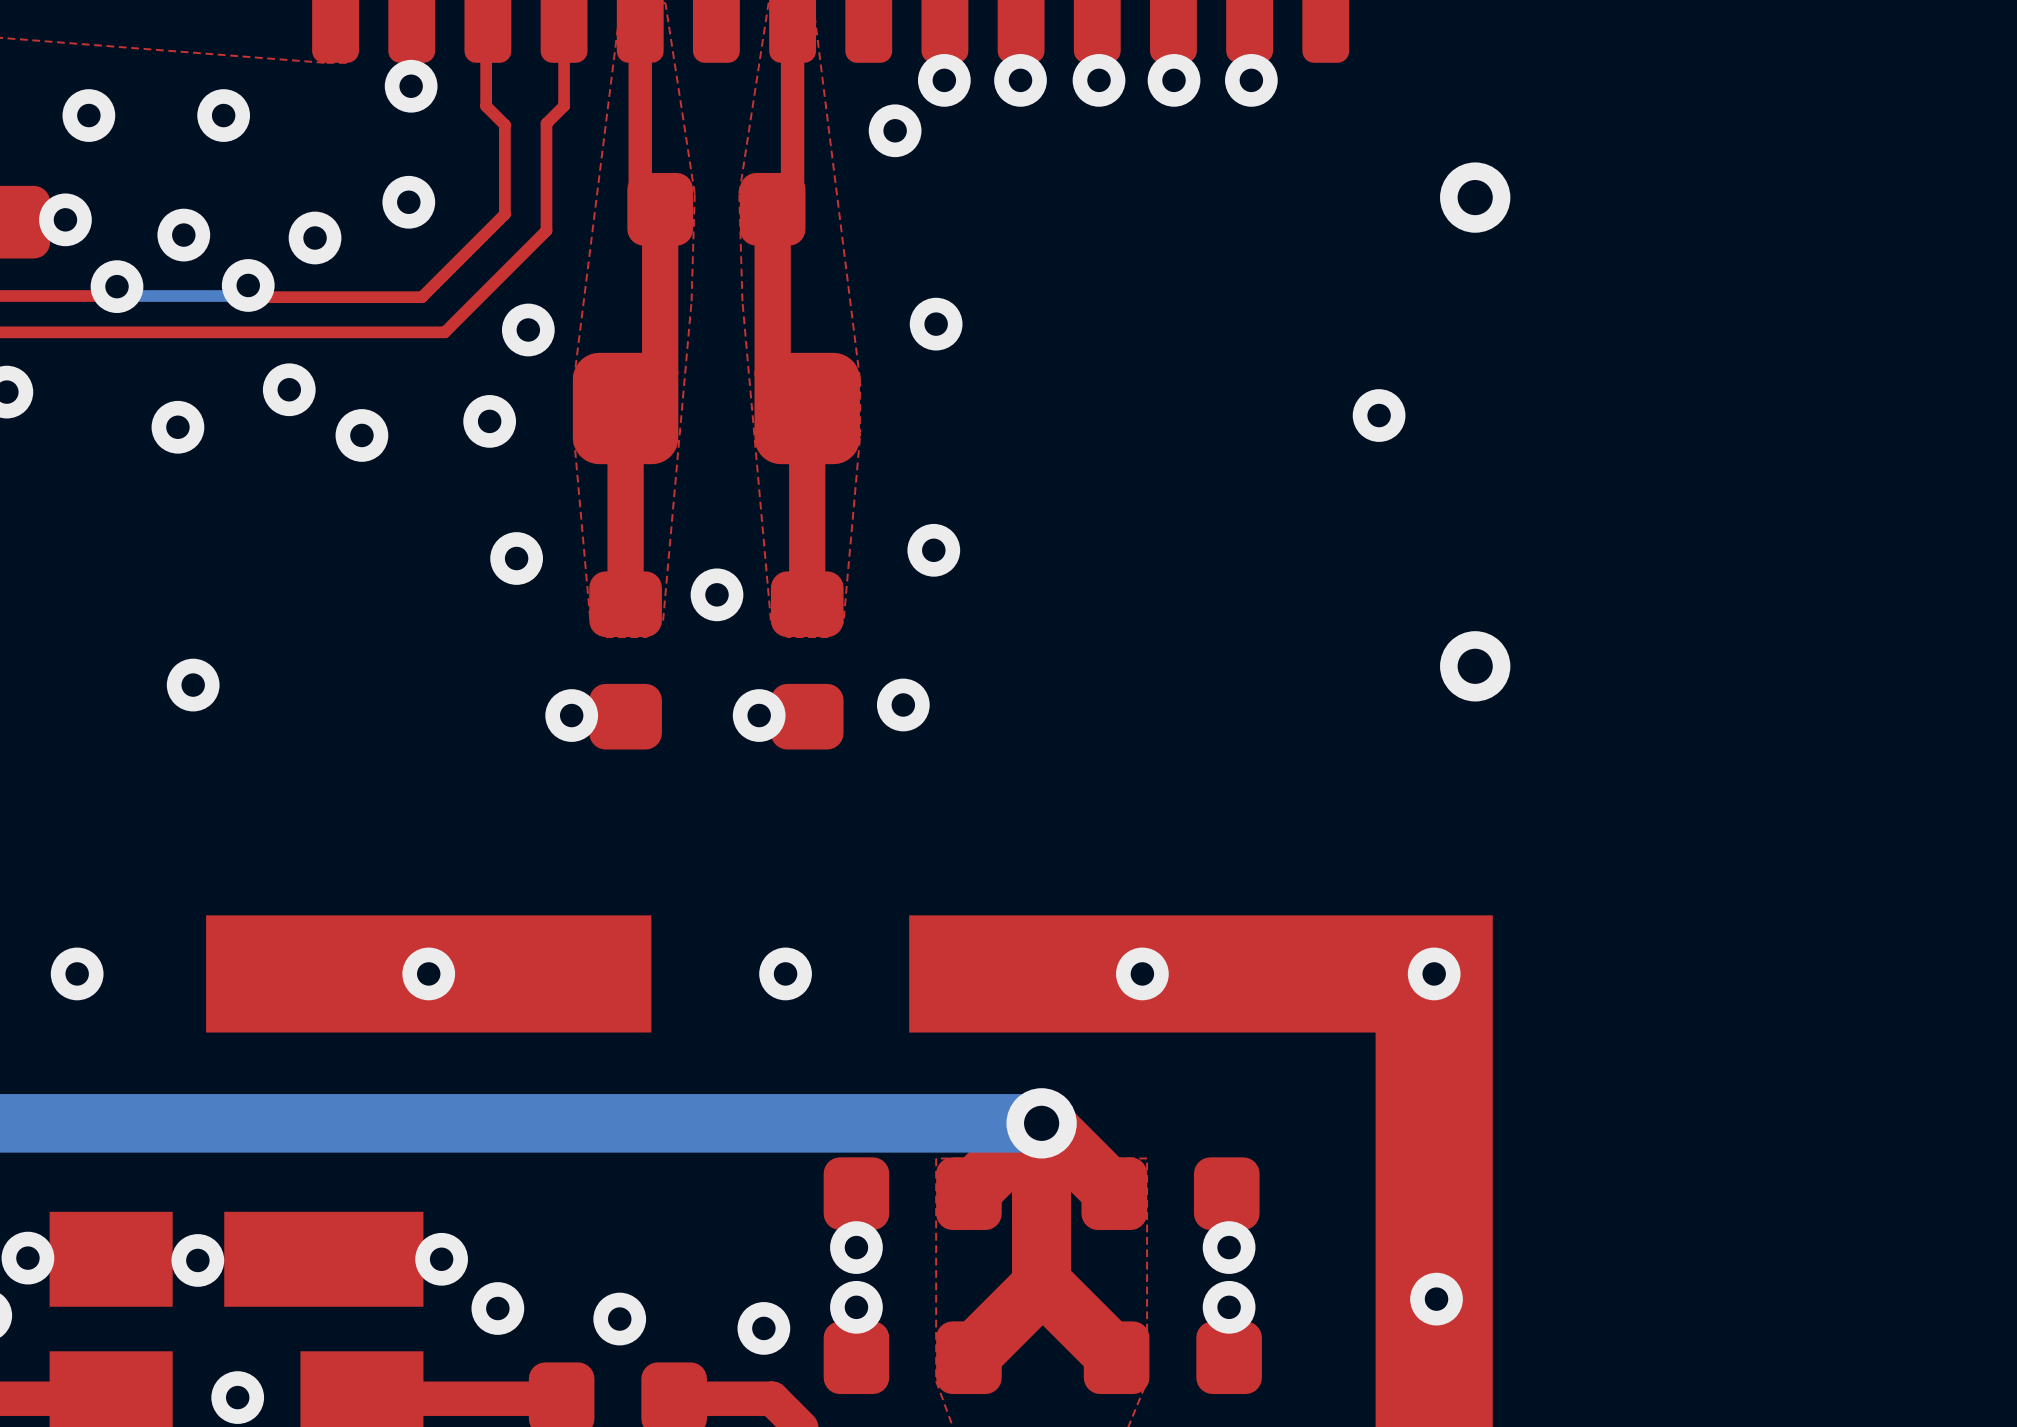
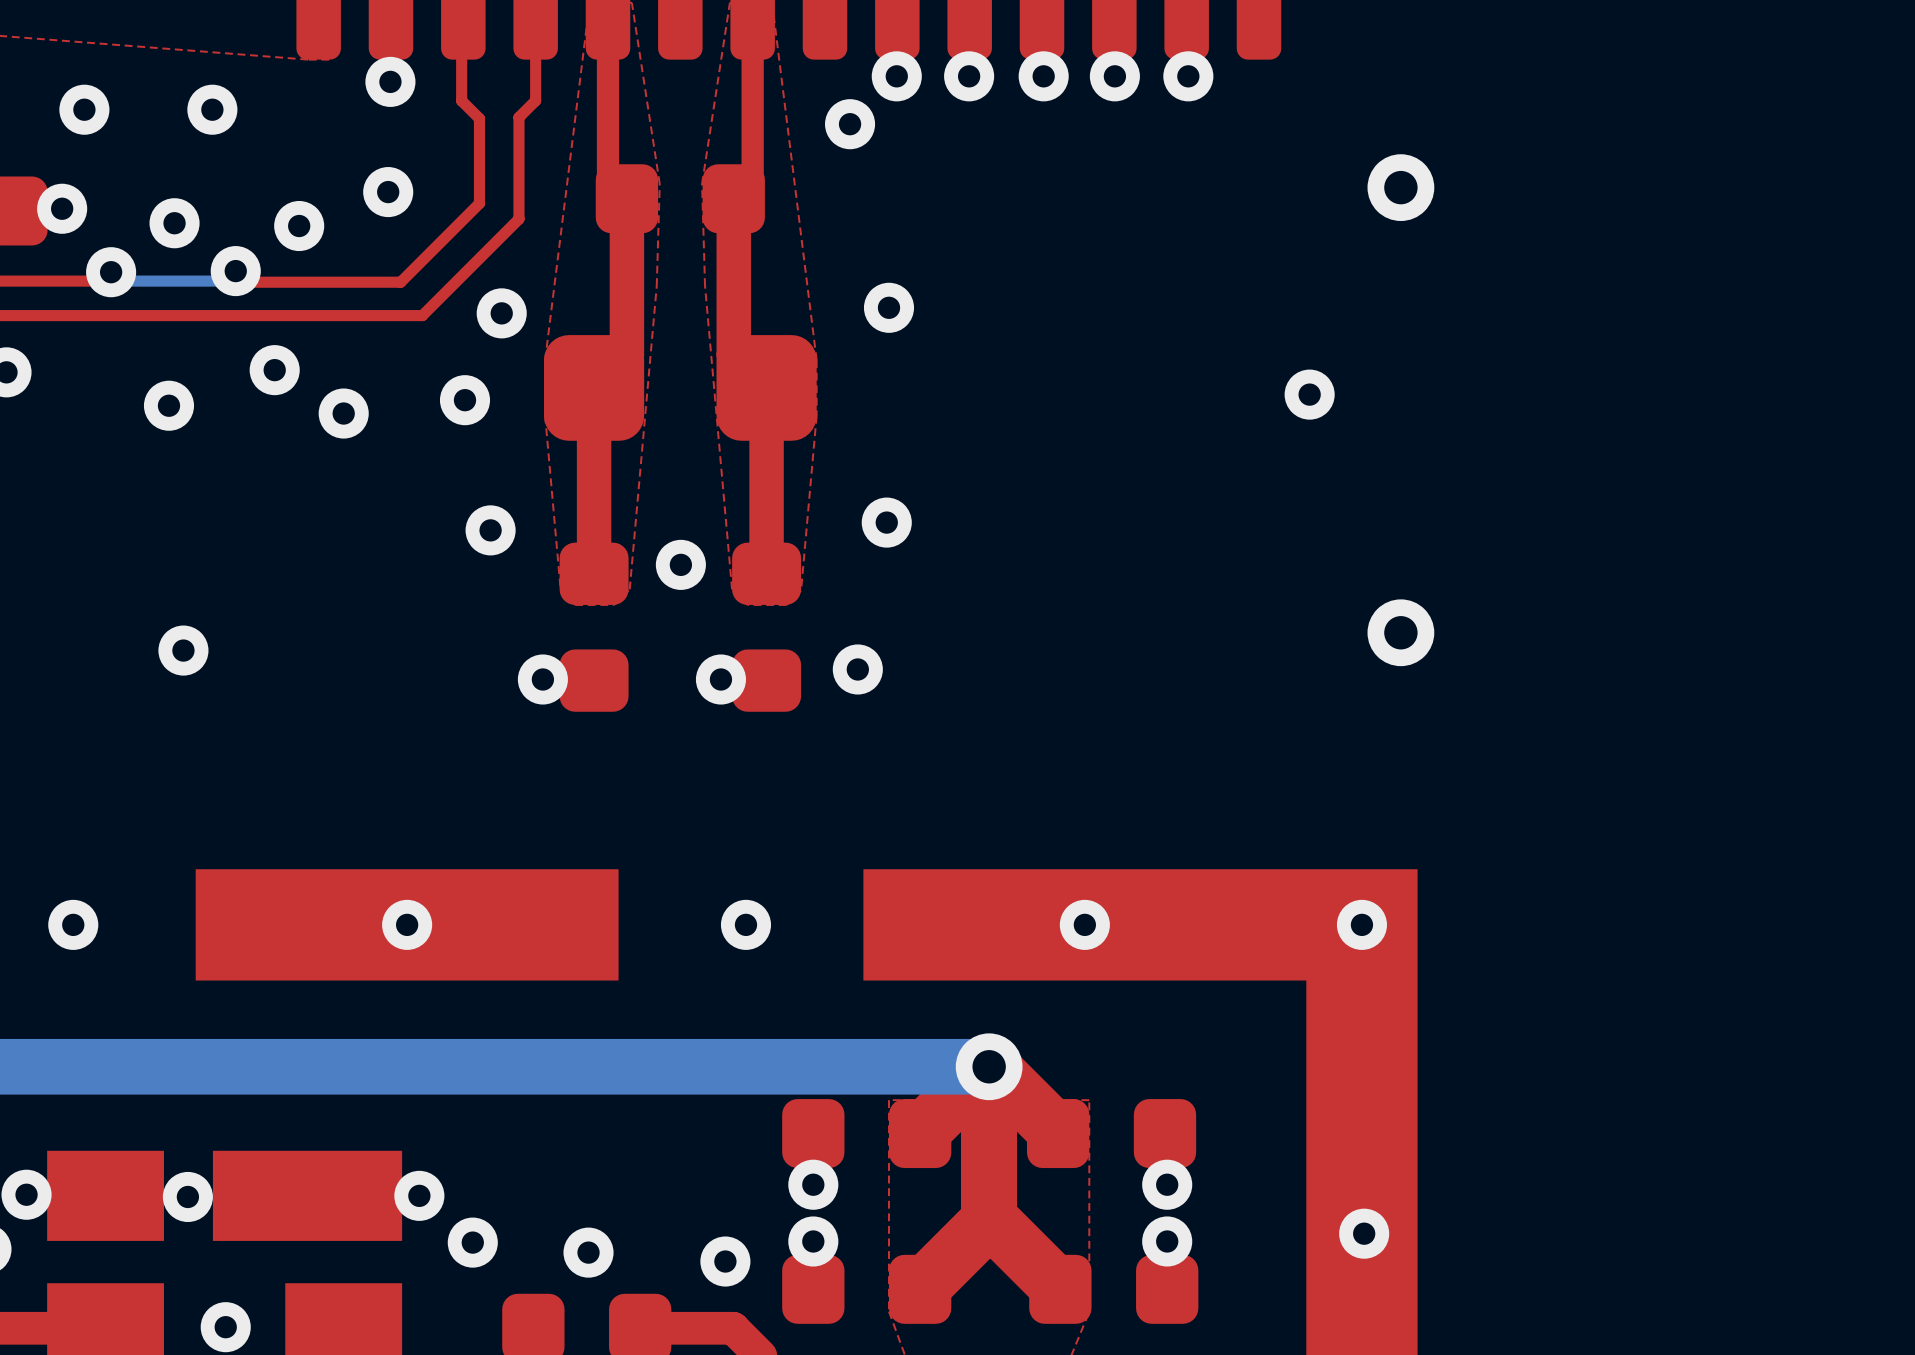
top track: (561, 1398) (361, 1398) -> none

